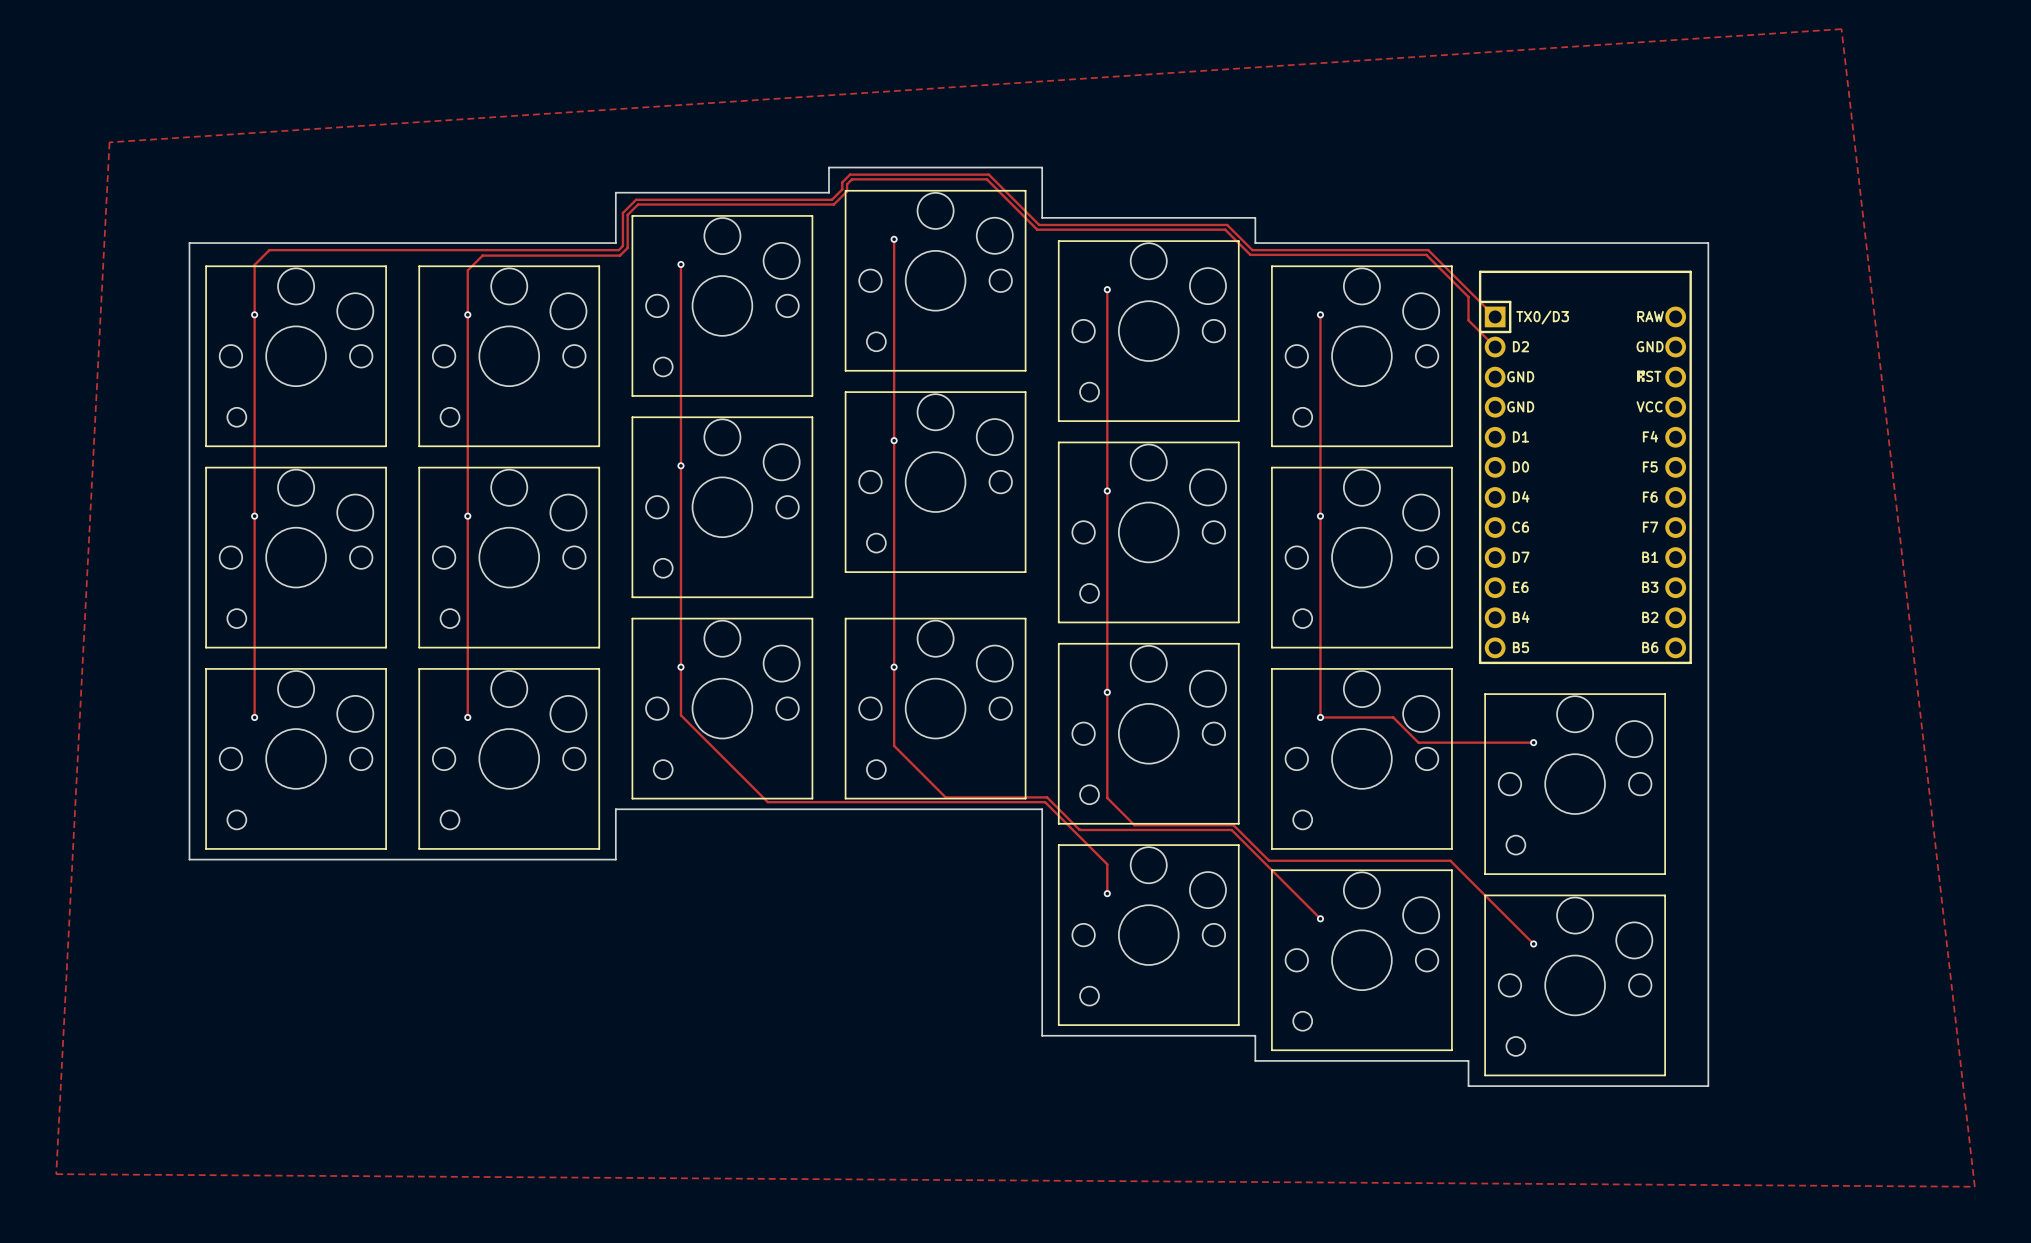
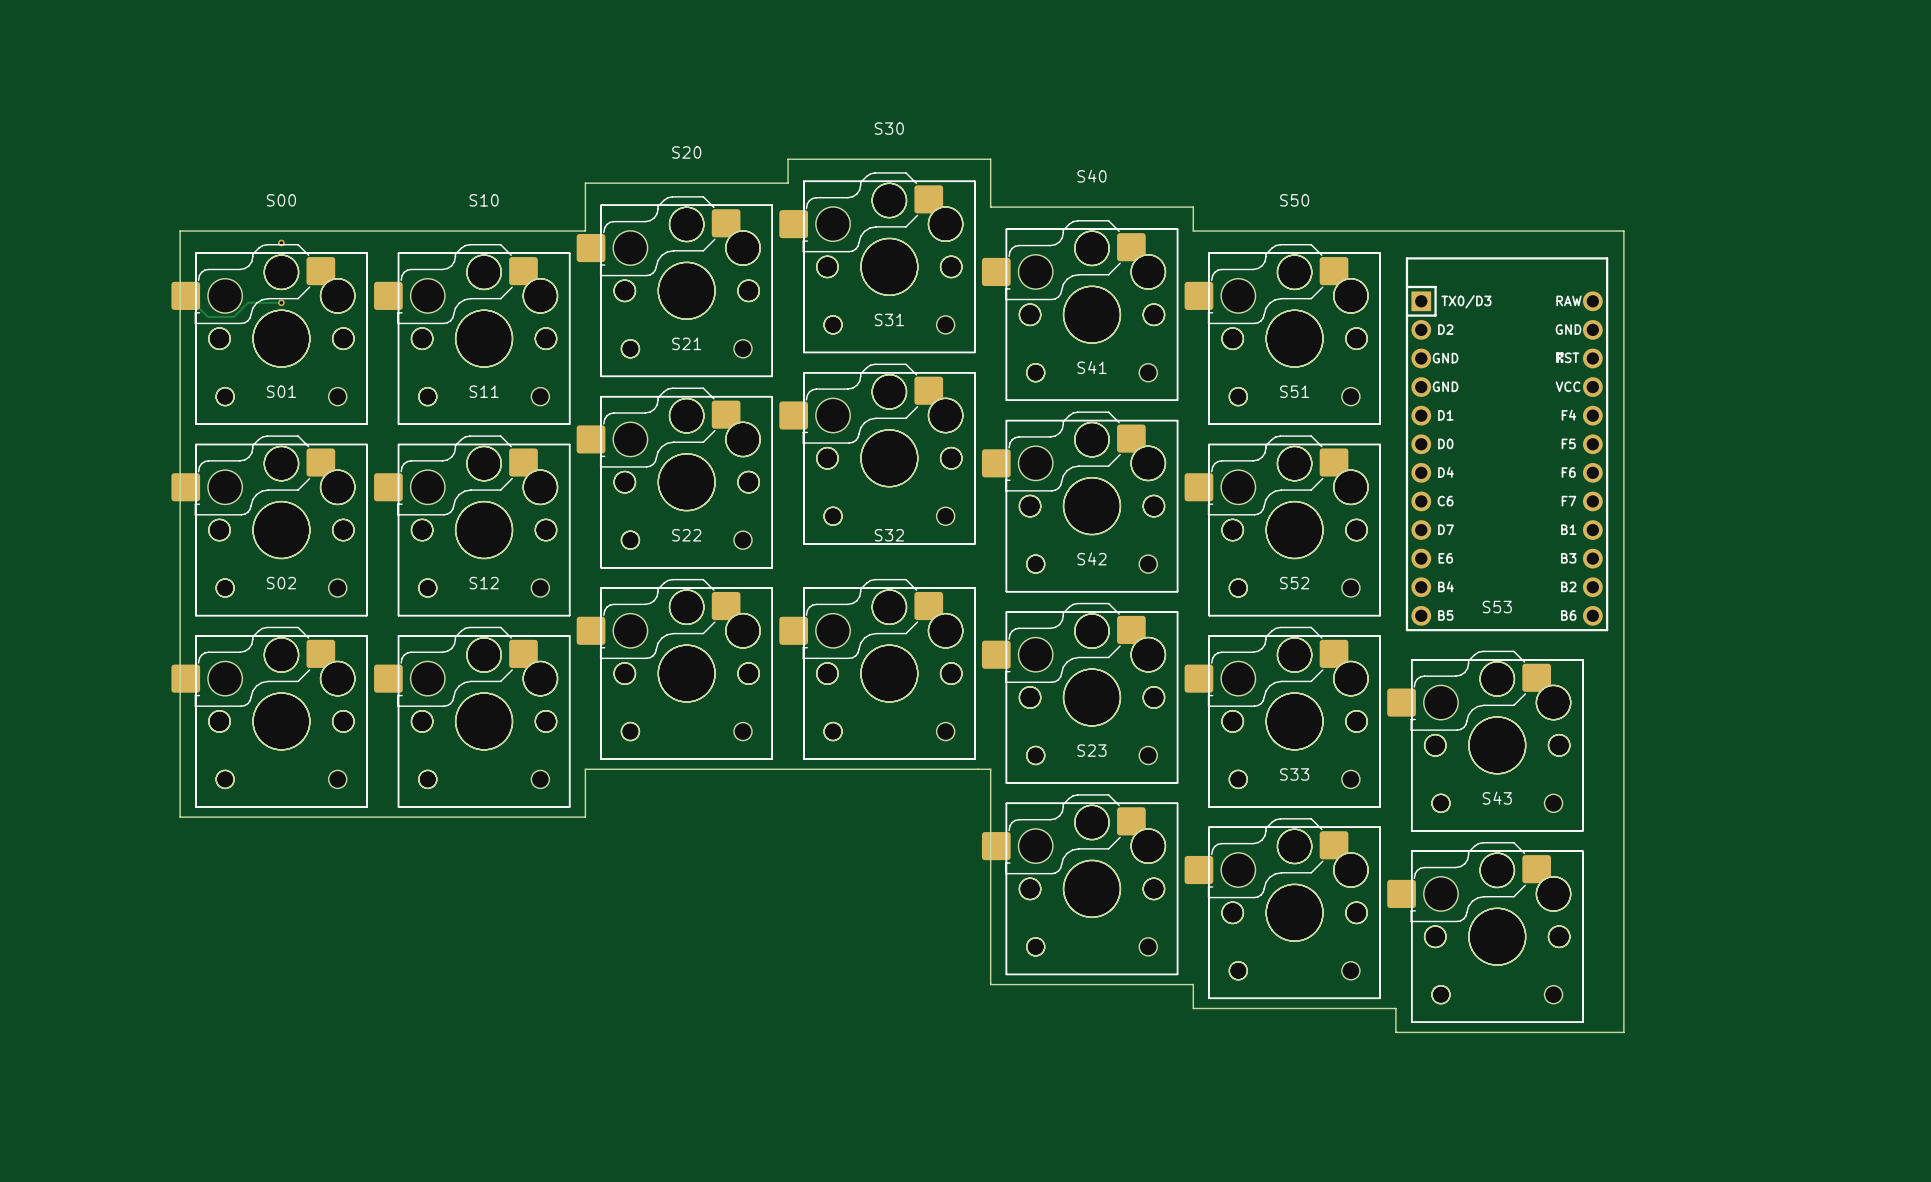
zone outline: (1841, 29) (1974, 1186) (56, 1174) (109, 142) (1841, 29) -> none
track: (894, 239) (894, 745) (945, 797) (1047, 797) (1080, 829) (1231, 829) (1320, 918) -> none
via: (894, 239) -> none
via: none -> (281, 242)
track: (680, 264) (680, 715) (767, 802) (1045, 802) (1107, 864) (1107, 893) -> none
via: (680, 264) -> none
S30: none -> (877, 262)
track: (1107, 289) (1107, 798) (1134, 825) (1233, 825) (1269, 860) (1450, 860) (1533, 943) -> none
via: (1107, 289) -> none
S20: none -> (674, 286)
track: none -> (186, 295) (207, 316) (233, 316) (248, 302) (281, 302)
via: (254, 314) -> none
via: (467, 314) -> none
track: (1320, 314) (1320, 717) (1393, 717) (1418, 742) (1533, 742) -> none
via: (1320, 314) -> none
track: (1495, 316) (1428, 250) (1252, 250) (1227, 224) (1039, 224) (988, 174) (850, 174) (842, 182) (842, 189) (831, 199) (636, 199) (622, 212) (622, 245) (618, 250) (269, 250) (254, 264) (254, 717) -> none
via: none -> (281, 302)
S40: none -> (1080, 310)
track: (1495, 347) (1468, 320) (1468, 297) (1426, 254) (1250, 254) (1225, 229) (1037, 229) (986, 179) (851, 179) (847, 184) (847, 191) (833, 204) (638, 204) (627, 214) (627, 247) (619, 255) (482, 255) (467, 270) (467, 717) -> none
S00: none -> (269, 334)
S10: none -> (472, 334)
S50: none -> (1282, 334)
via: (894, 440) -> none
via: (680, 465) -> none
S31: none -> (877, 454)
via: (1107, 490) -> none
S21: none -> (674, 478)
via: (254, 516) -> none
via: (467, 516) -> none
via: (1320, 516) -> none
S41: none -> (1080, 501)
S01: none -> (269, 525)
S11: none -> (472, 525)
S51: none -> (1282, 525)
via: (680, 667) -> none
via: (894, 667) -> none
via: (1107, 692) -> none
S22: none -> (674, 669)
S32: none -> (877, 669)
via: (254, 717) -> none
via: (467, 717) -> none
via: (1320, 717) -> none
S42: none -> (1080, 693)
via: (1533, 742) -> none
S02: none -> (269, 717)
S12: none -> (472, 717)
S52: none -> (1282, 717)
S53: none -> (1485, 741)
via: (1107, 893) -> none
via: (1320, 918) -> none
S23: none -> (1080, 884)
via: (1533, 943) -> none
S33: none -> (1282, 908)
S43: none -> (1485, 932)

